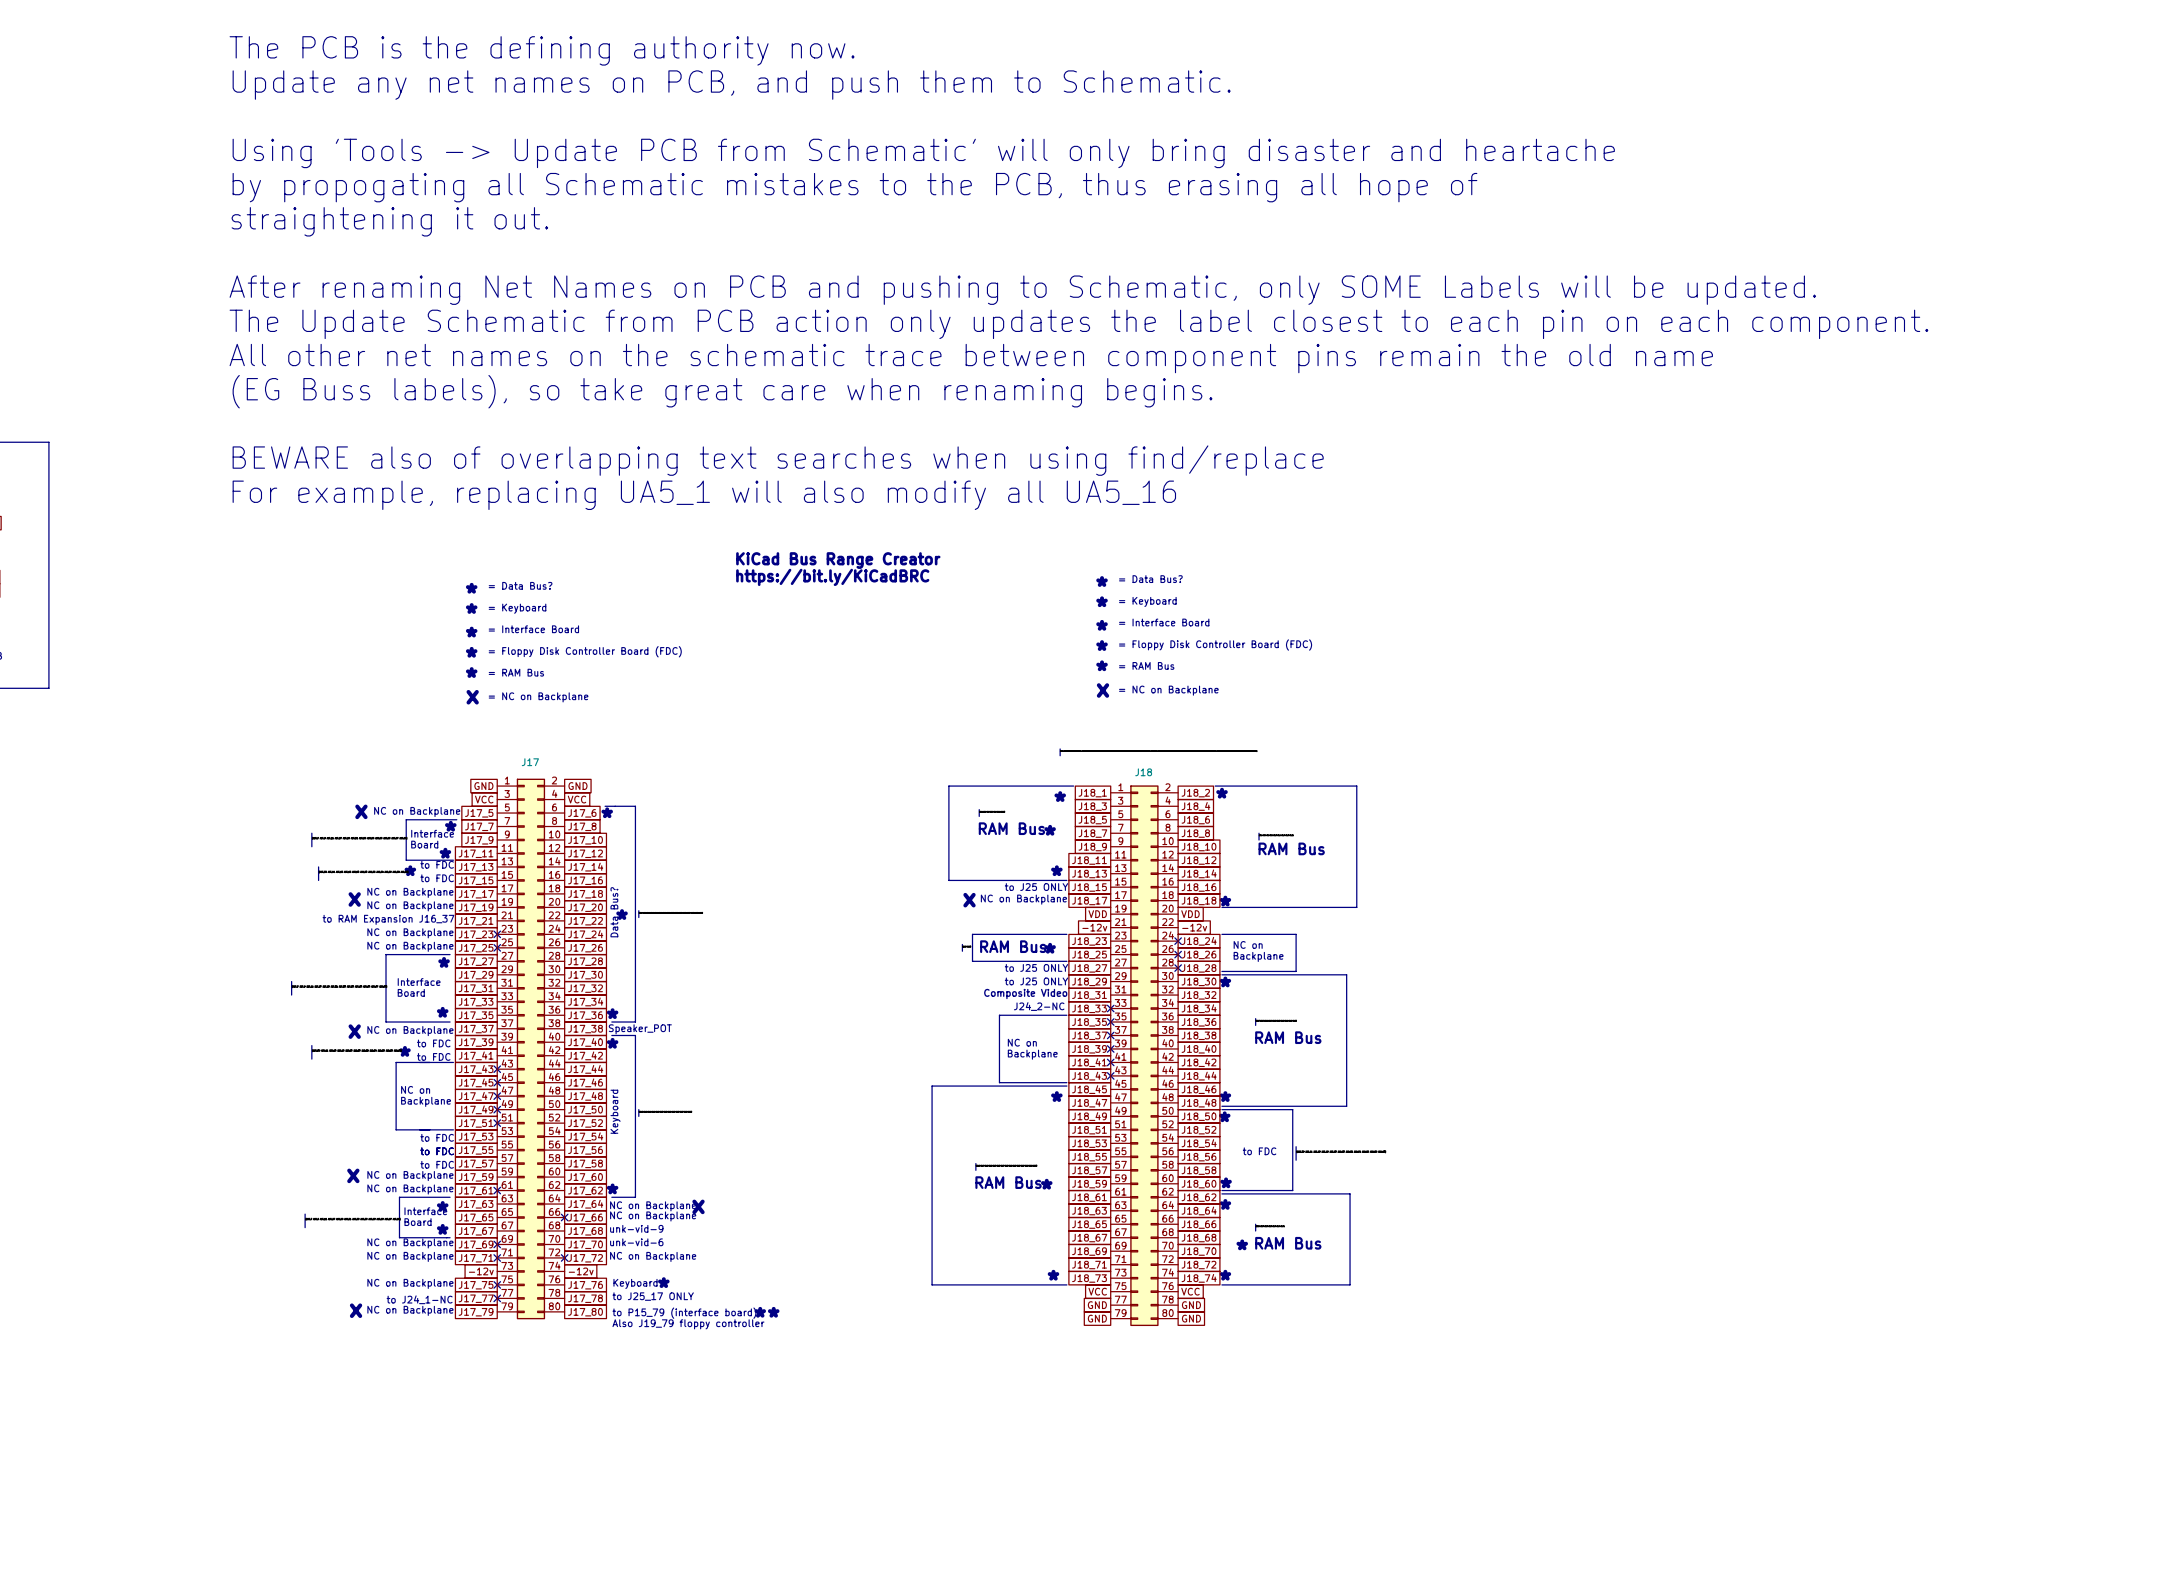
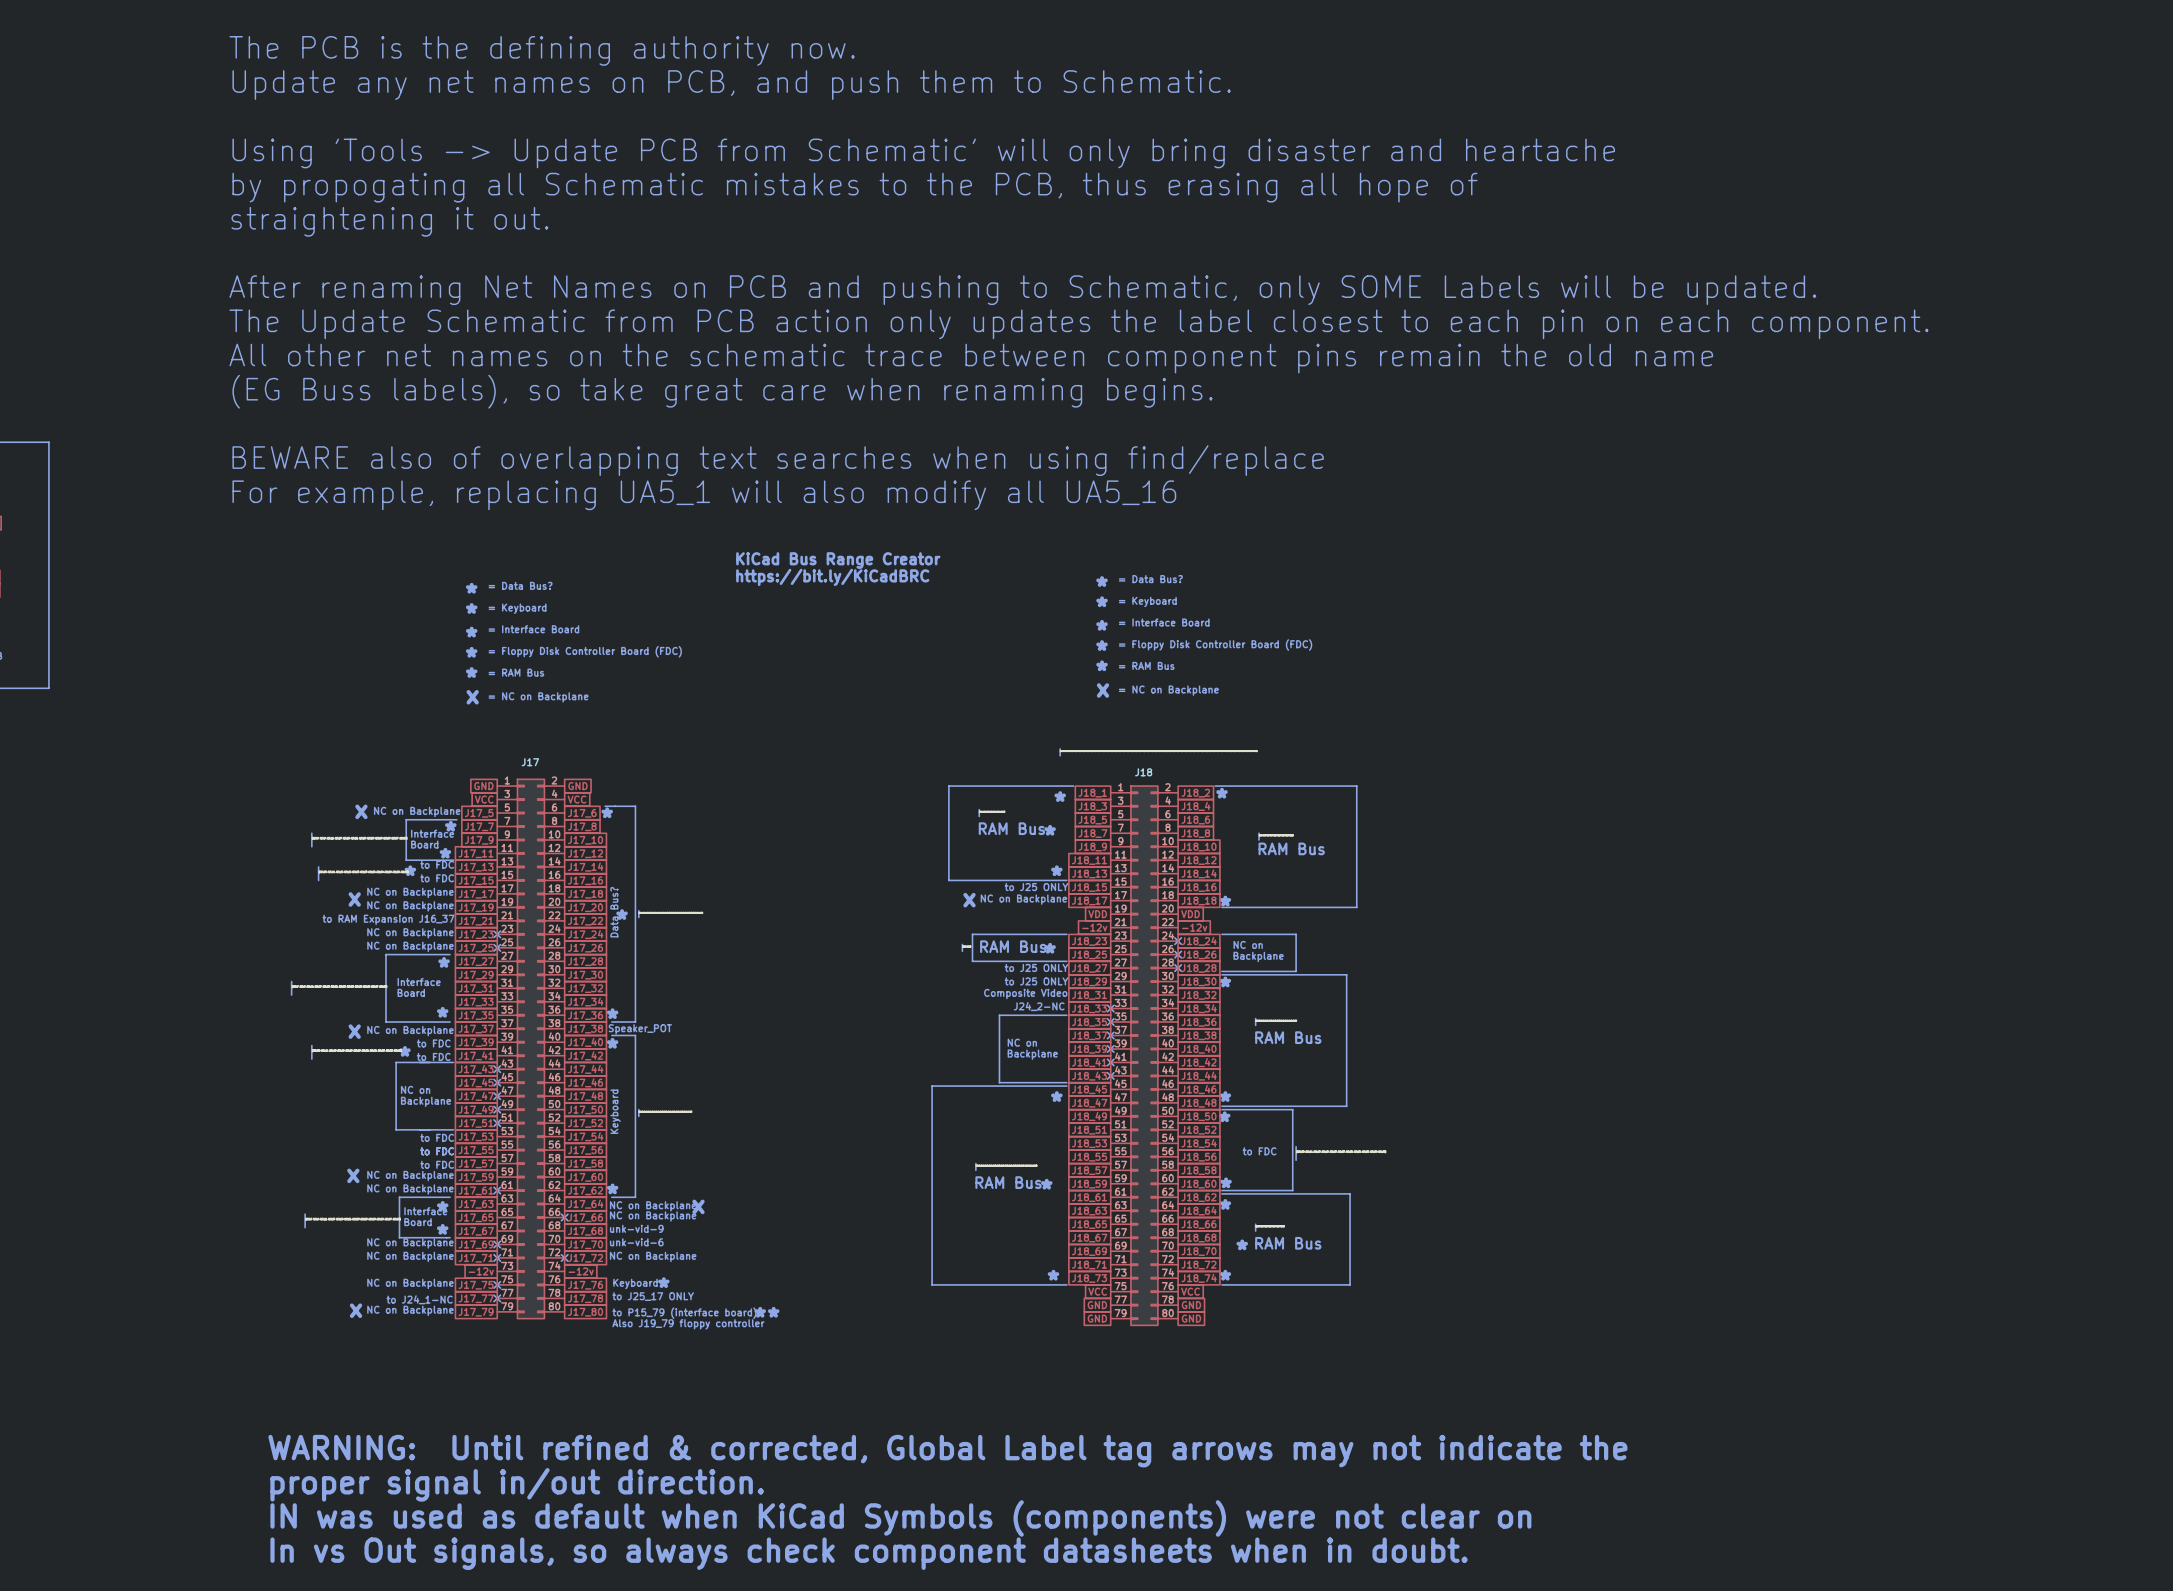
text: none -> WARNING: Until refined & corrected, Global Label tag arrows may not indicate the (947, 1451)
text: none -> proper signal in/out direction. (517, 1484)
text: none -> IN was used as default when KiCad Symbols (components) were not clear on (900, 1518)
text: none -> In vs Out signals, so always check component datasheets when in doubt. (869, 1553)

